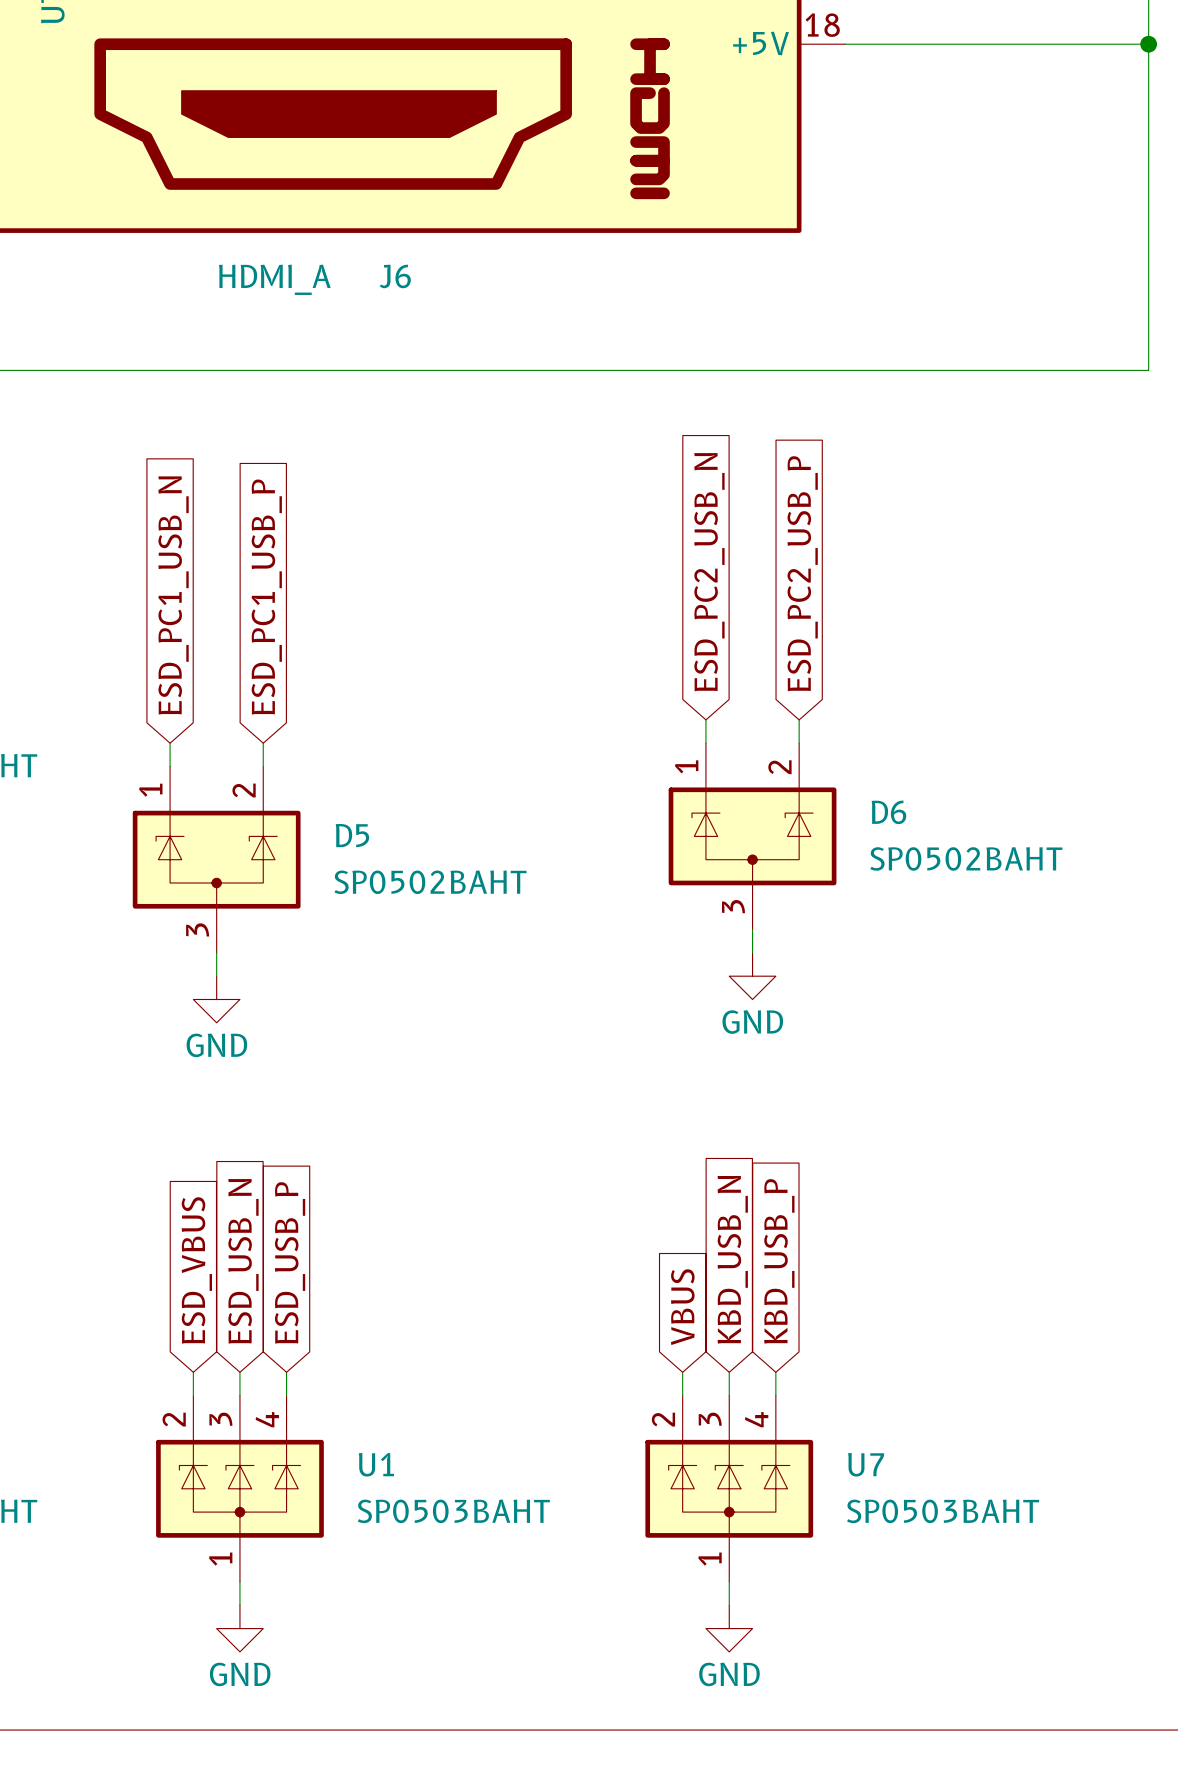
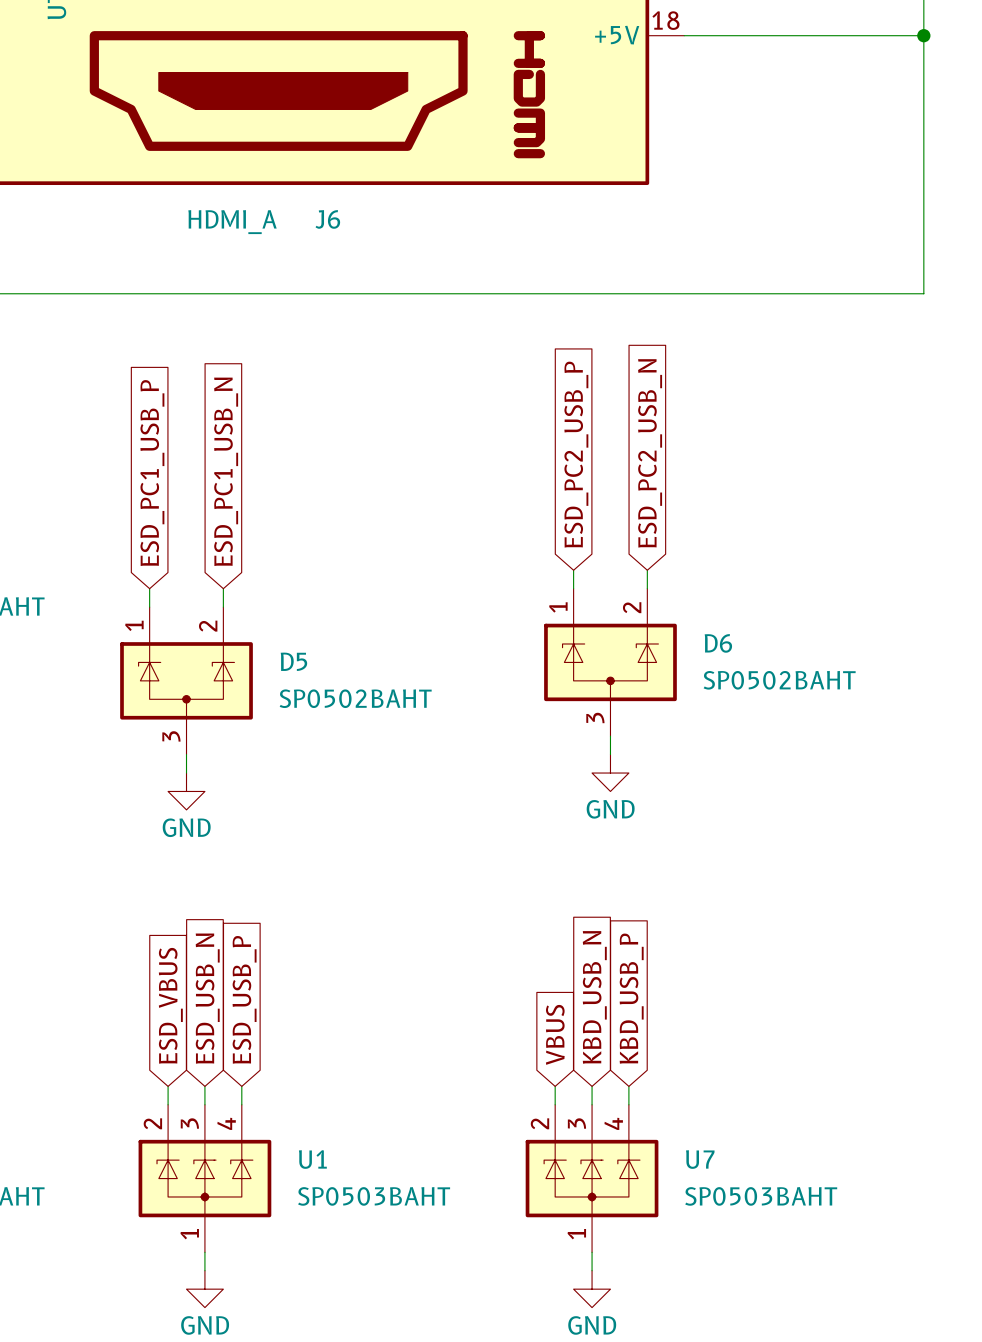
global label: ESD_PC2_USB_N (709, 572) -> ESD_PC2_USB_P (576, 454)
global label: ESD_PC2_USB_P (802, 573) -> ESD_PC2_USB_N (650, 453)
global label: ESD_PC1_USB_N (173, 595) -> ESD_PC1_USB_P (152, 473)
global label: ESD_PC1_USB_P (266, 597) -> ESD_PC1_USB_N (226, 471)

